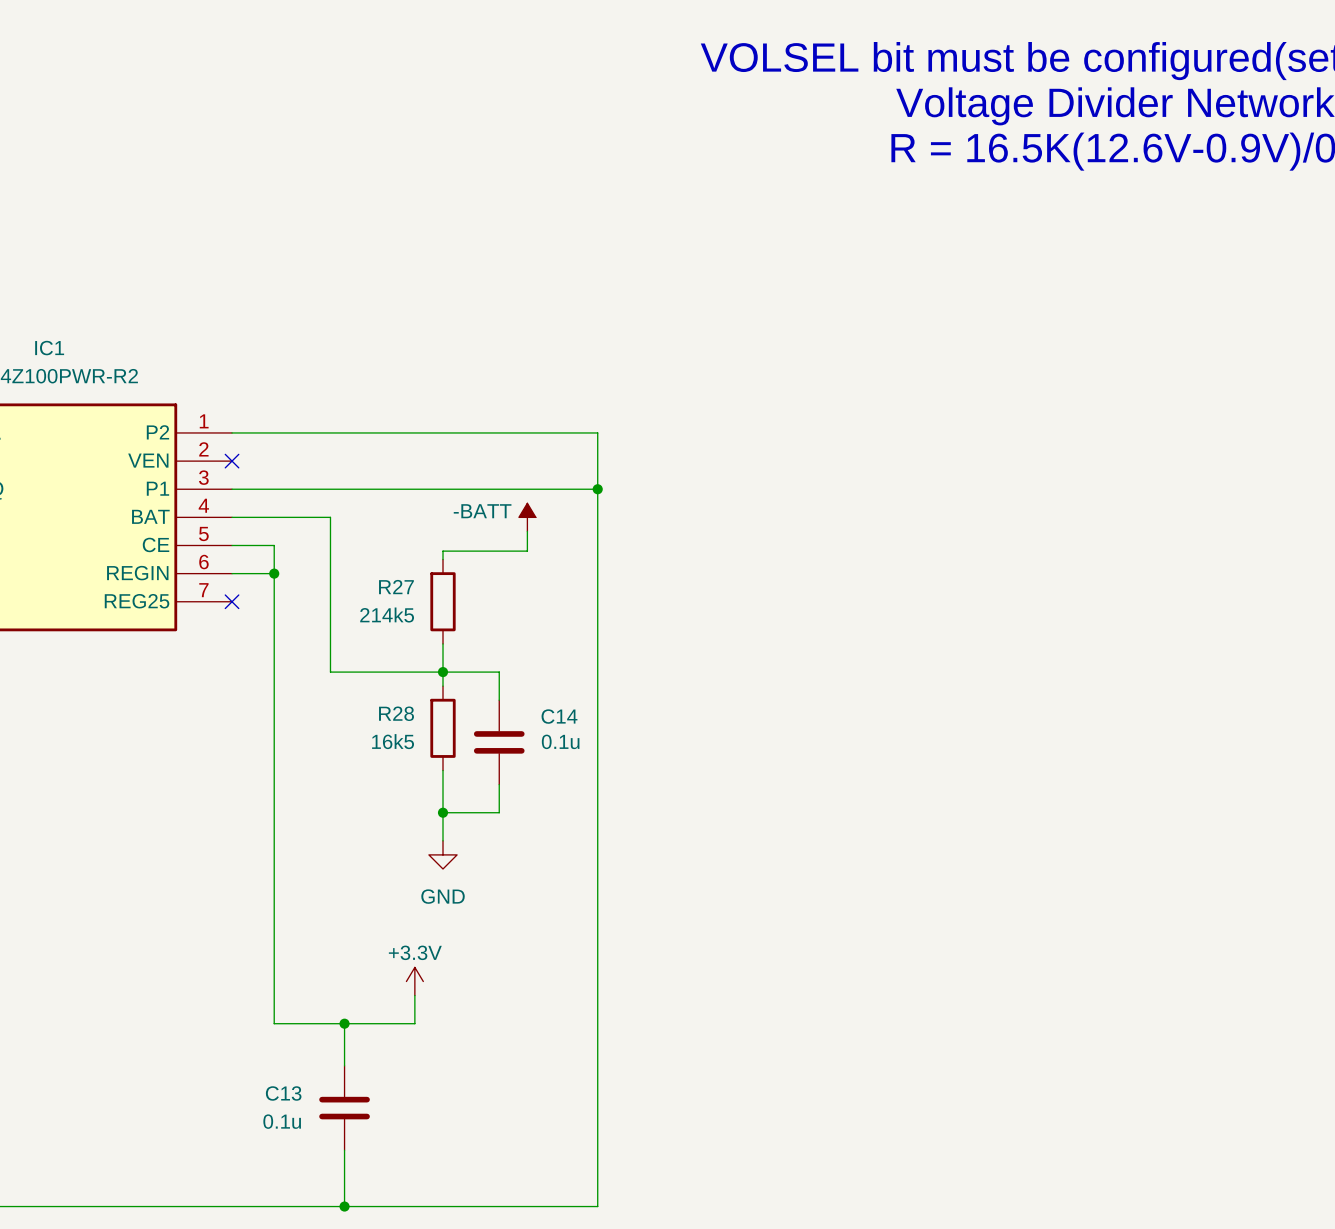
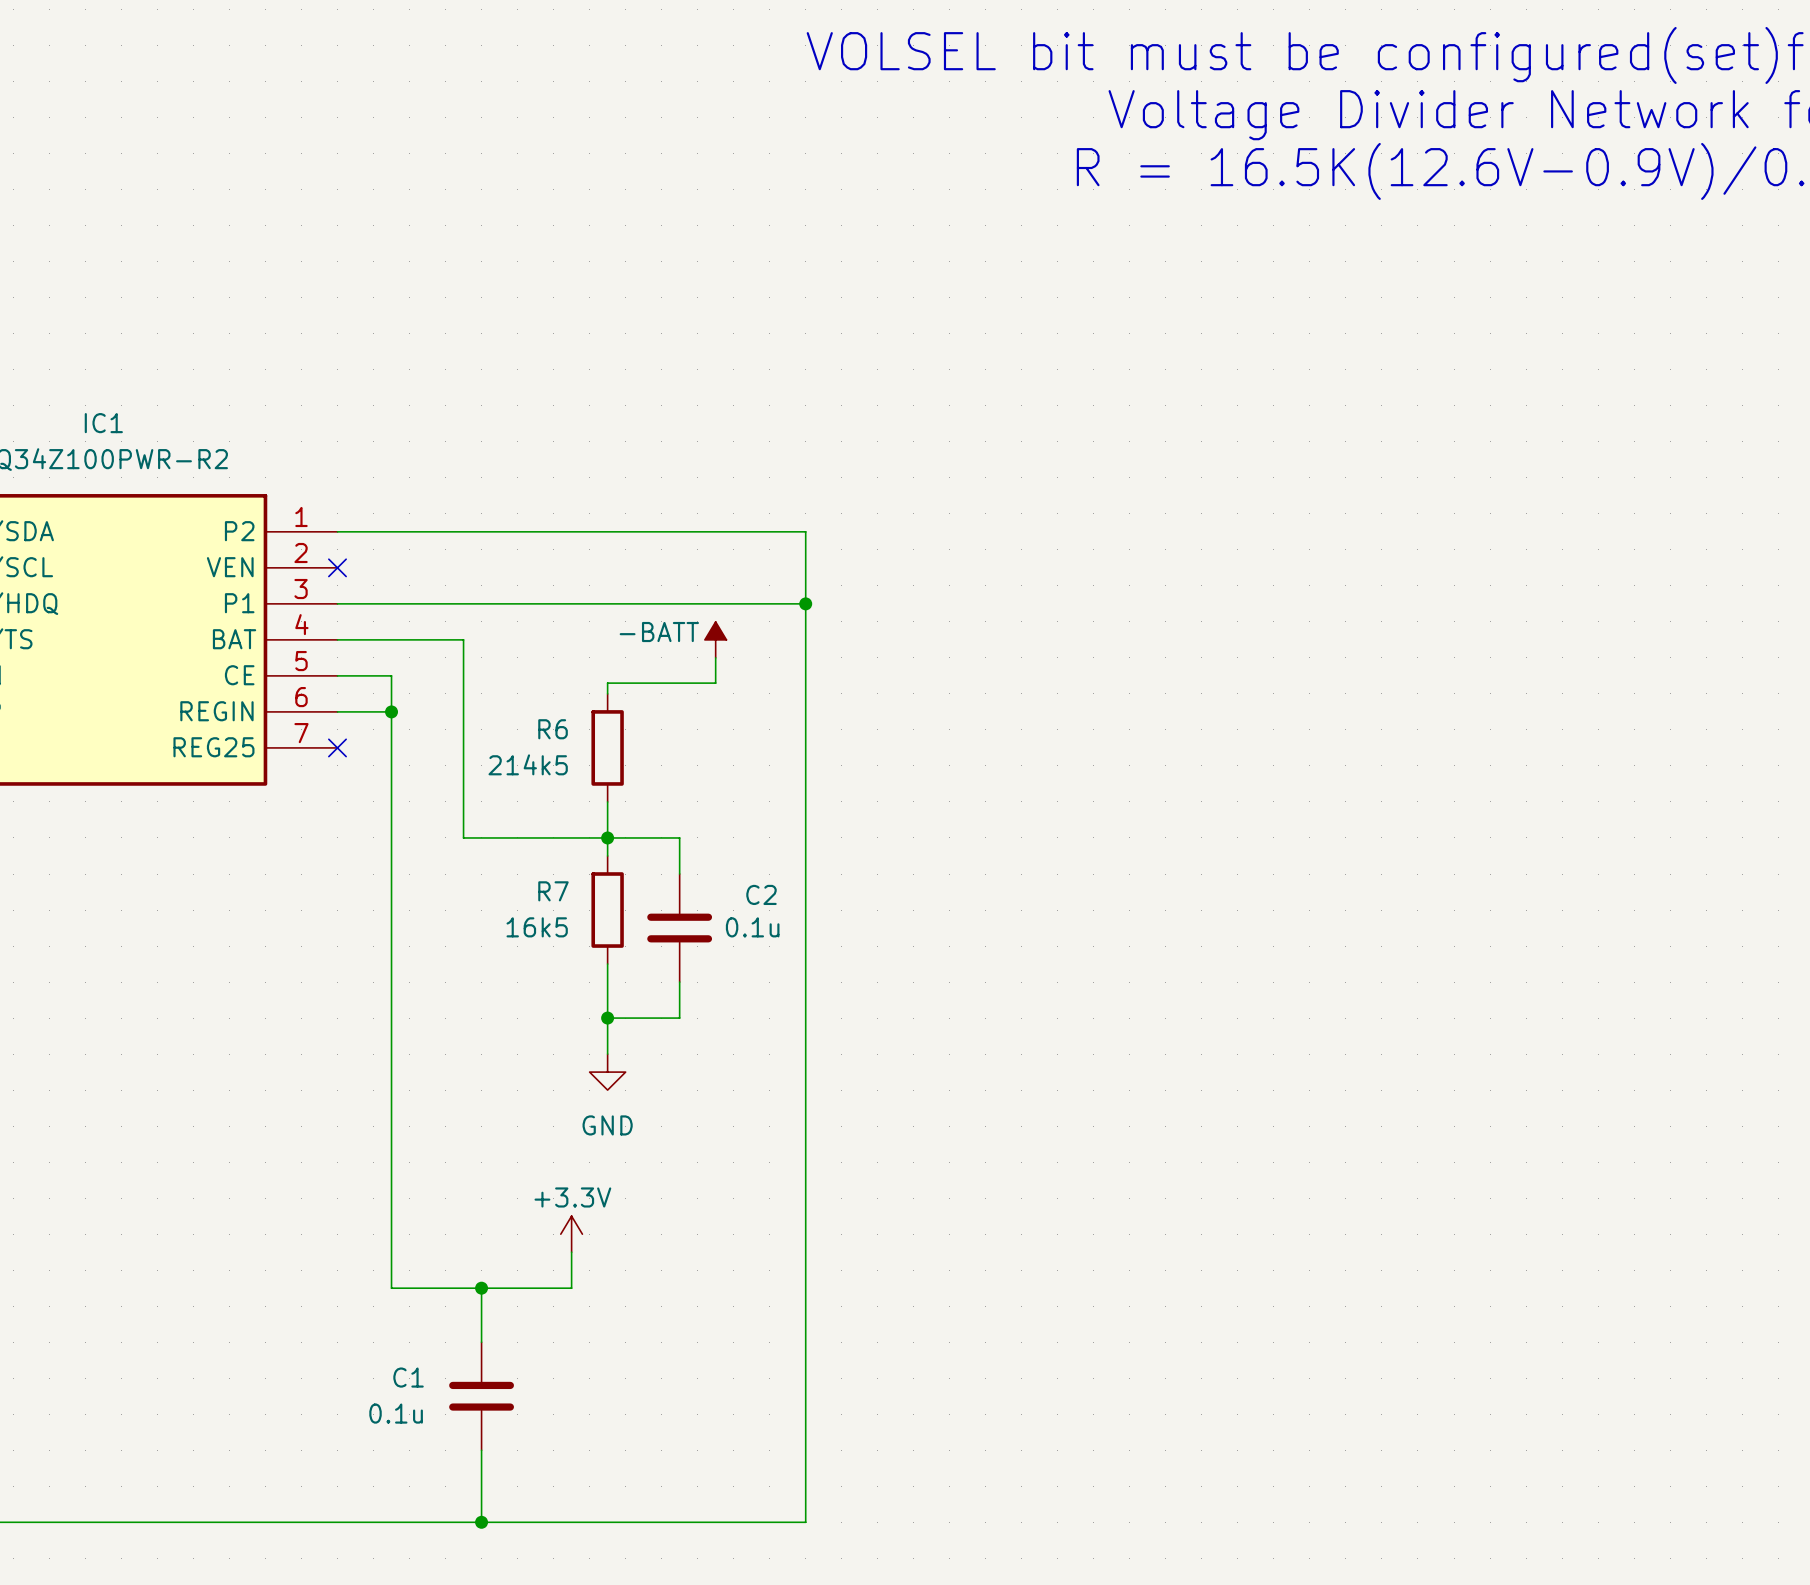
R27 name: R27 (396, 587) -> R6 (553, 729)
R28 name: R28 (396, 713) -> R7 (553, 891)
C14 name: C14 (559, 716) -> C2 (761, 894)
C13 name: C13 (283, 1093) -> C1 (408, 1377)

